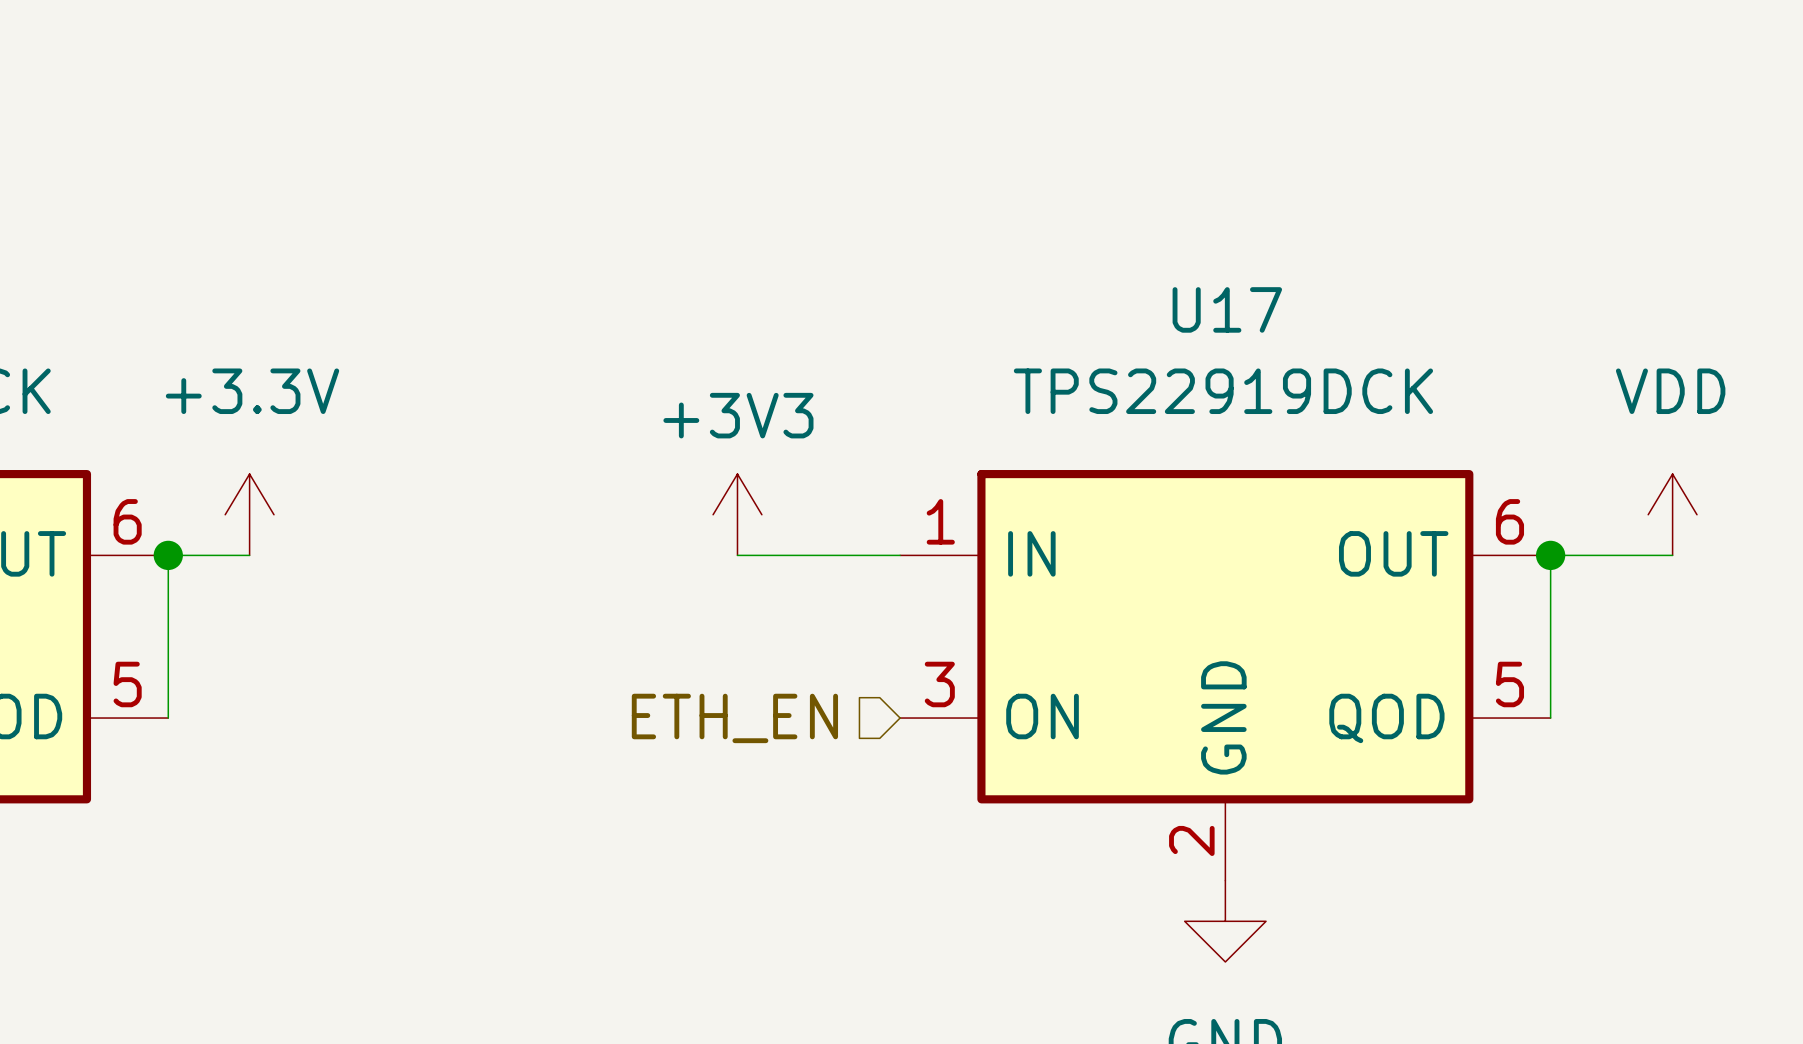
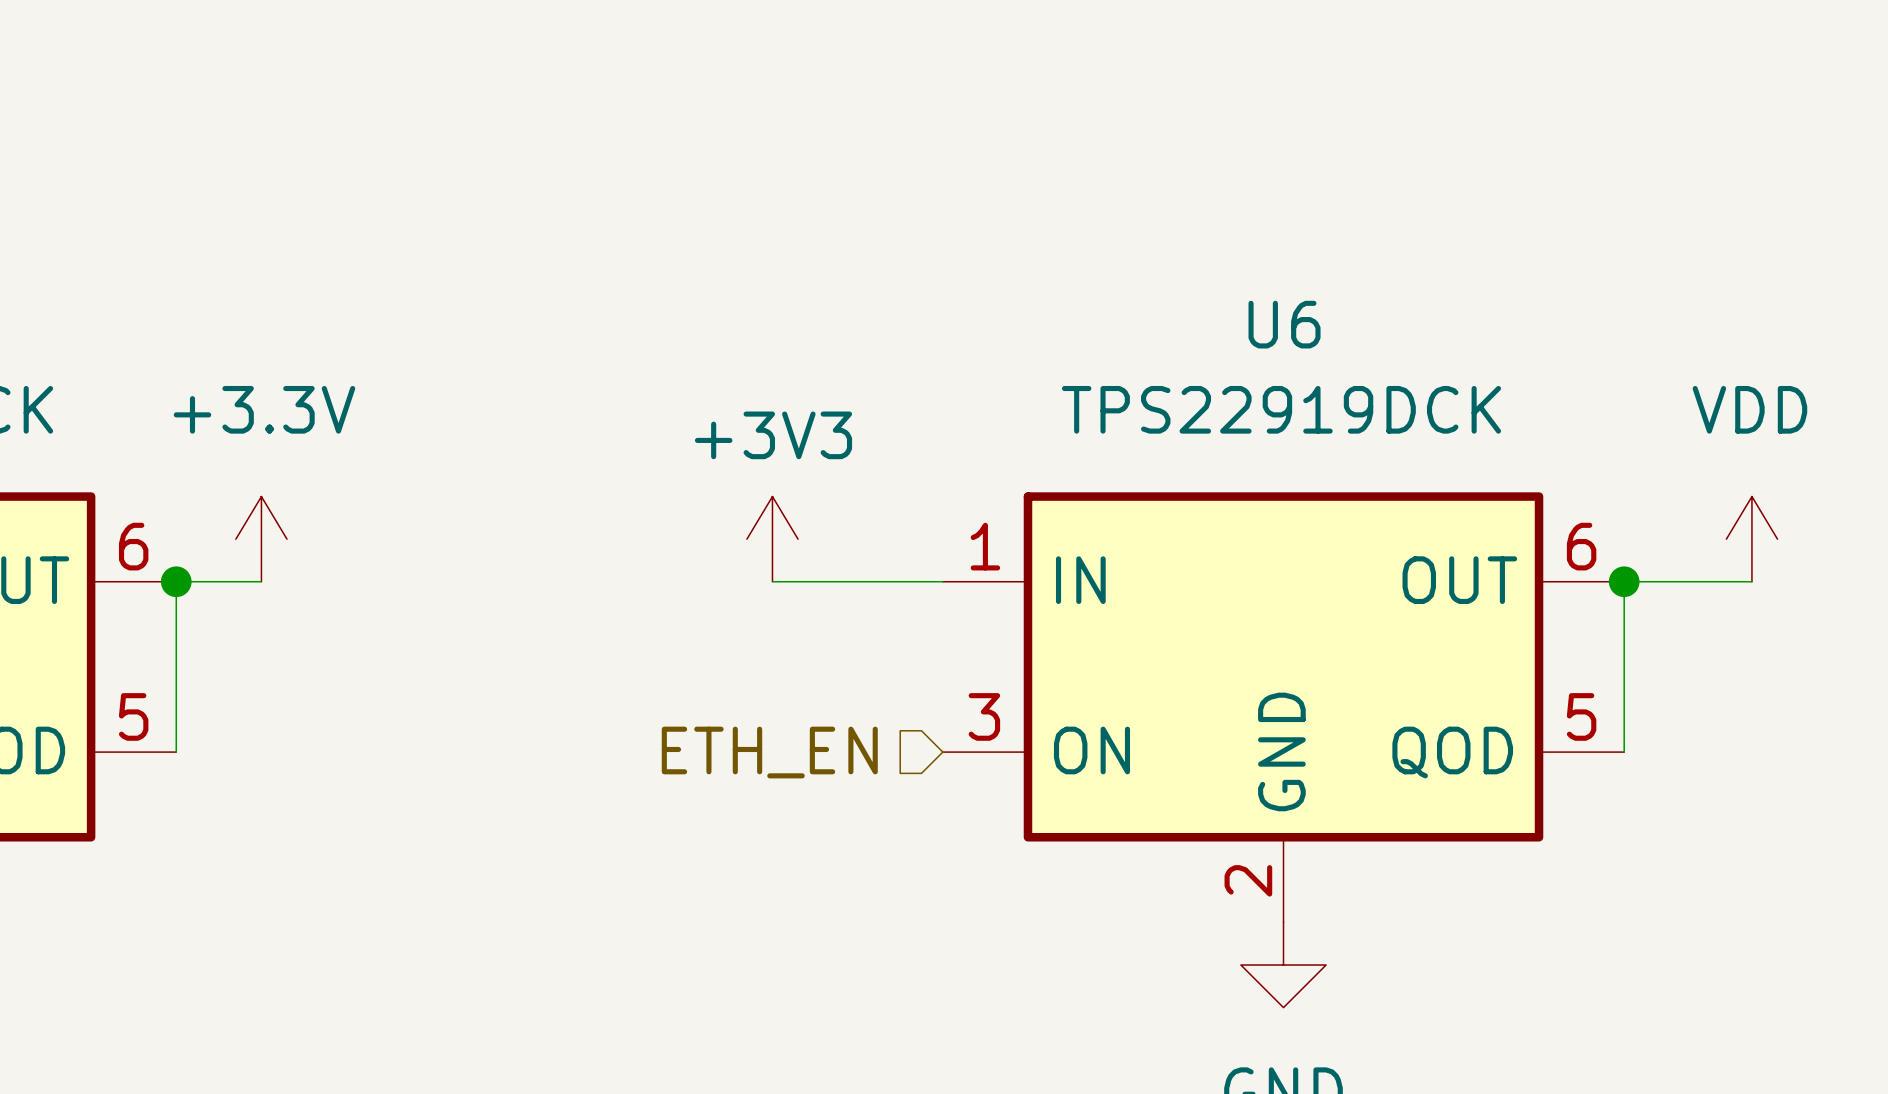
U17 name: U17 (1227, 309) -> U6 (1284, 324)

